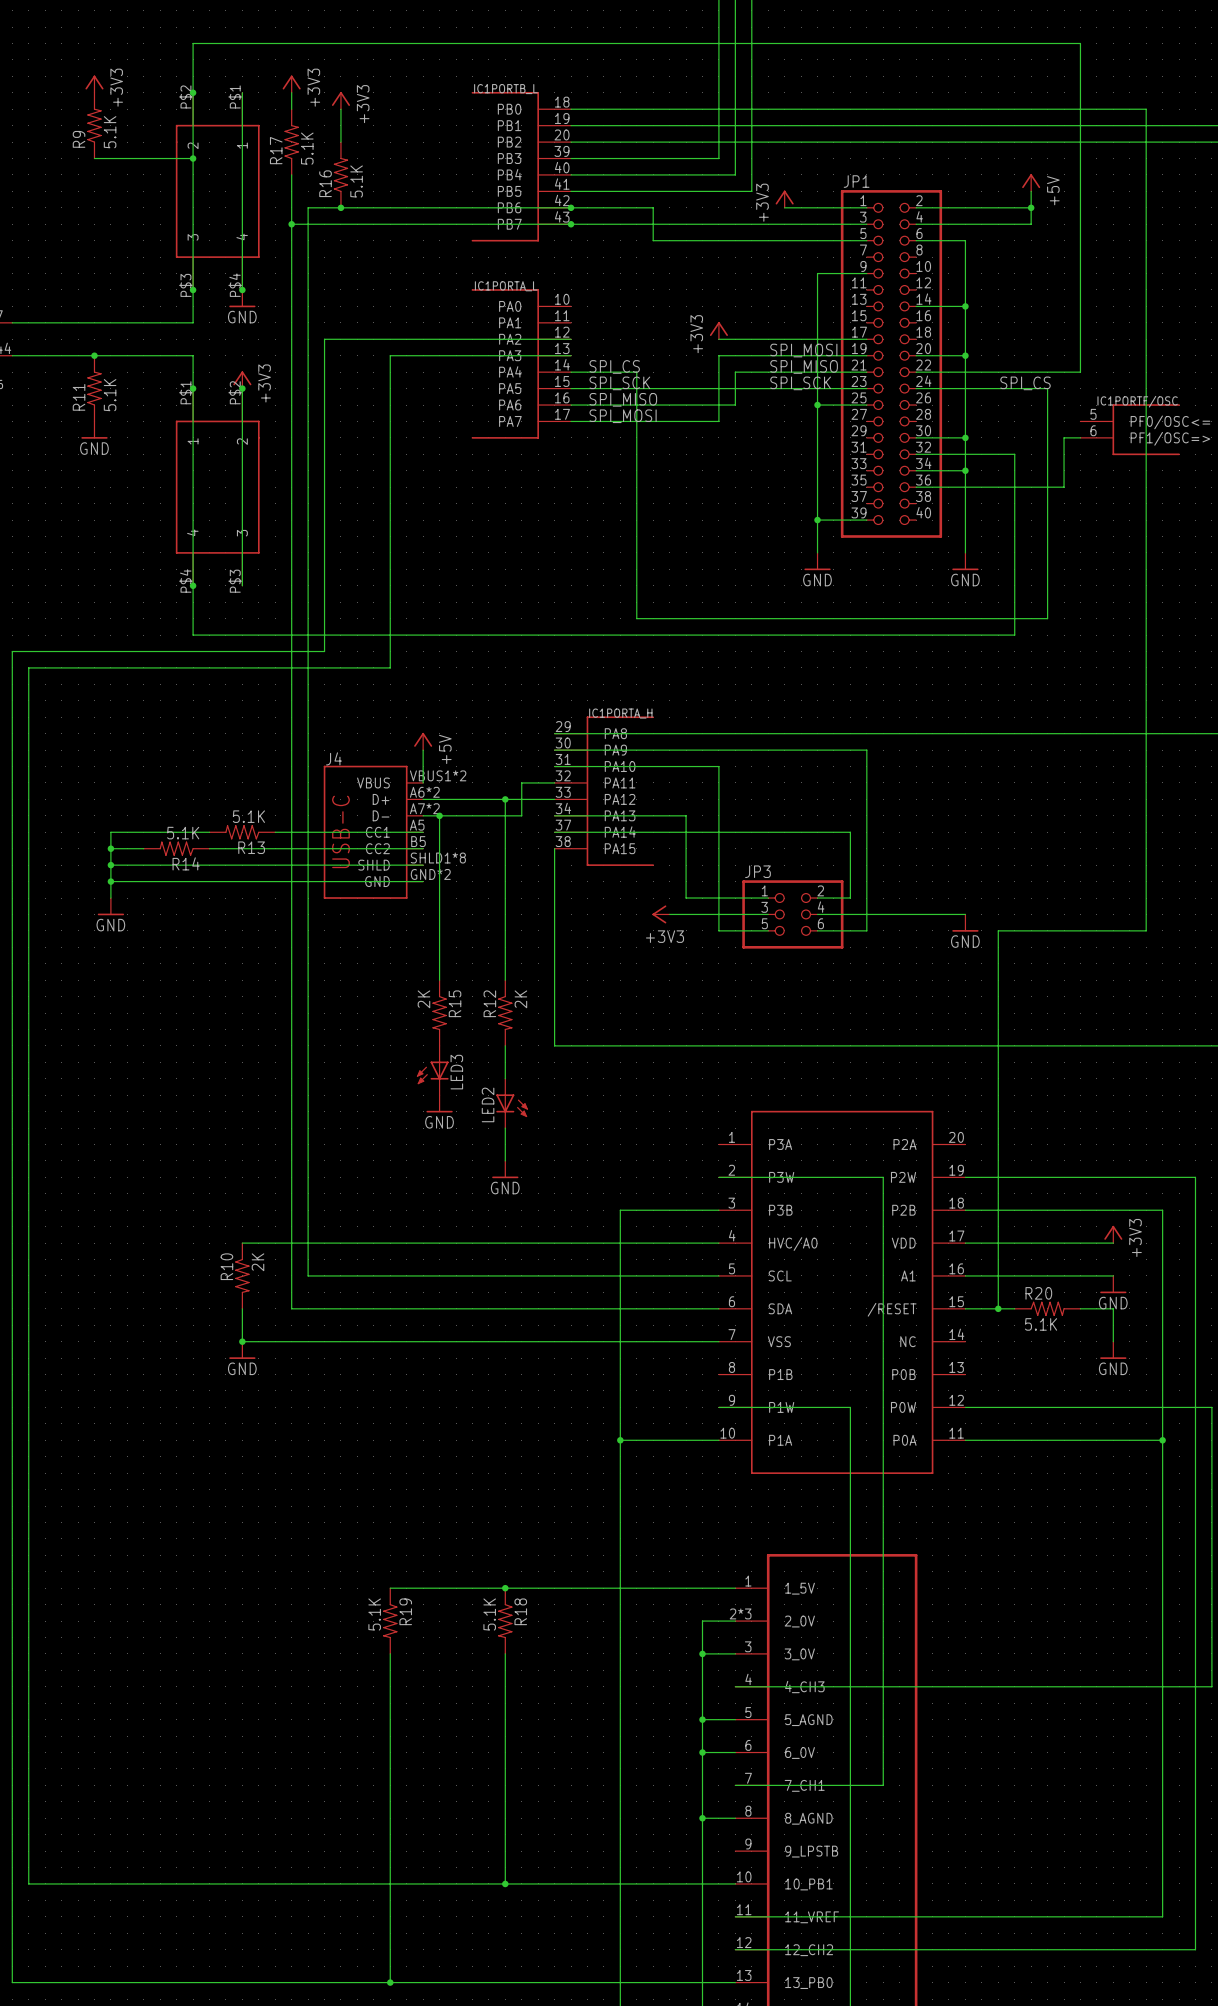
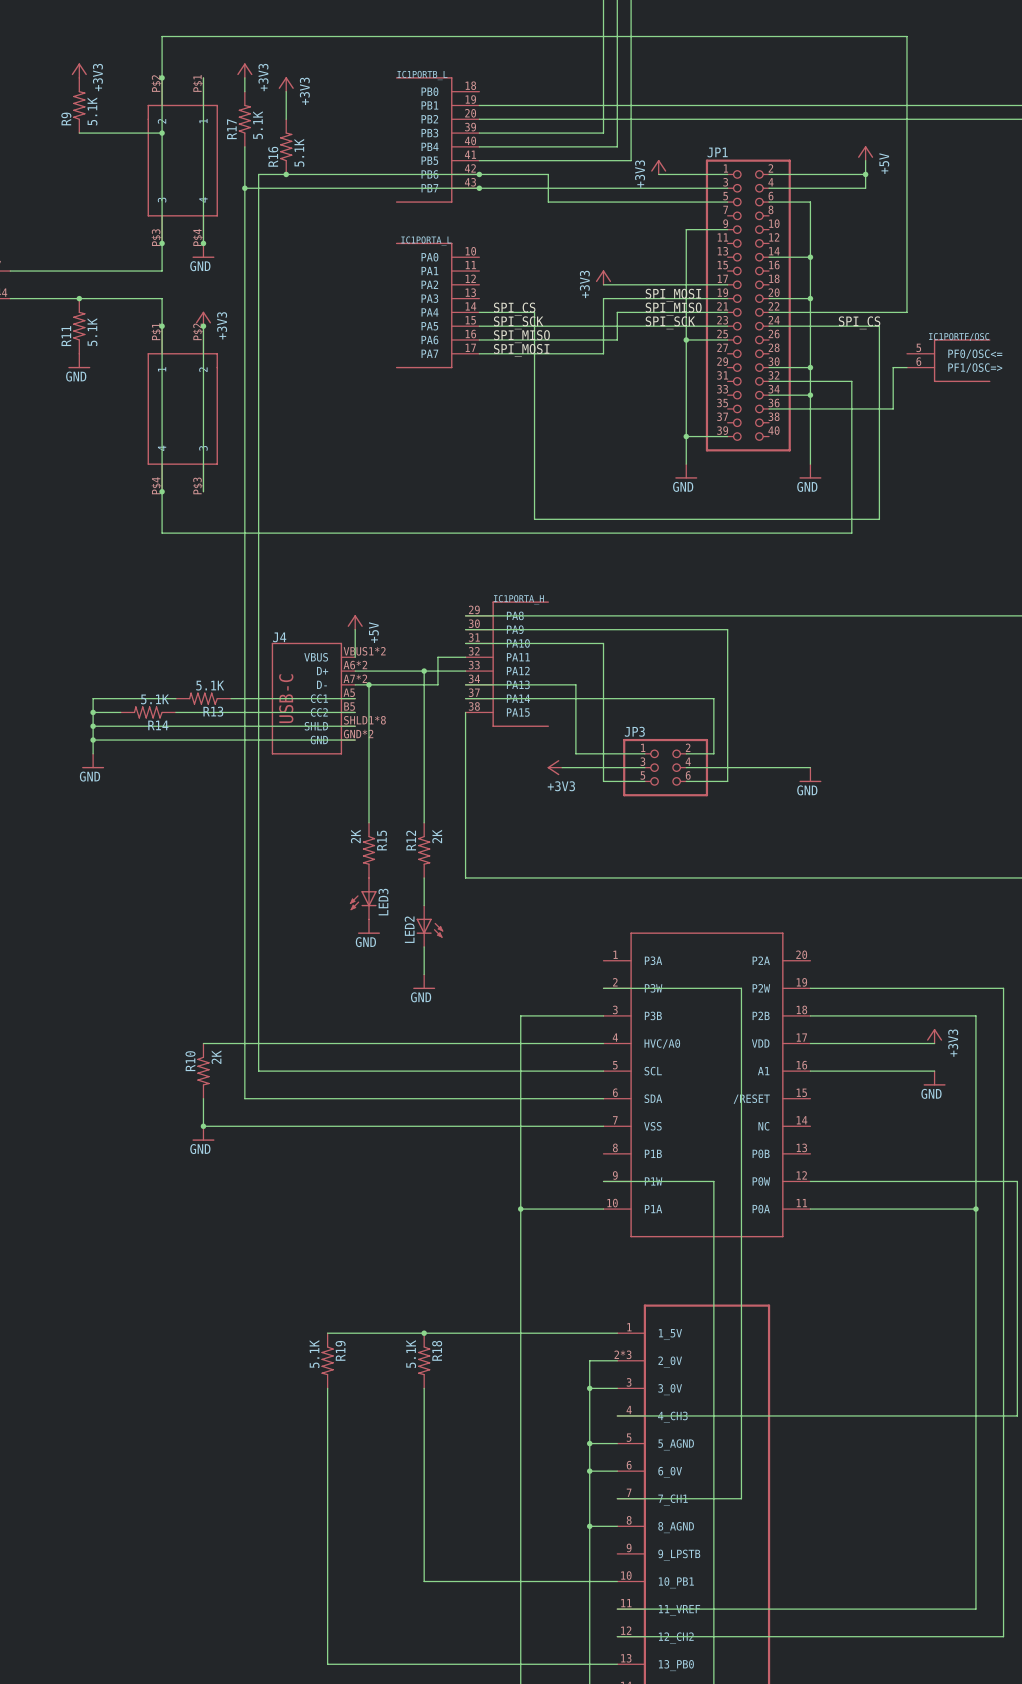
wire: (571, 109) (1146, 109) (1146, 930) (998, 930) (998, 1308) -> none
wire: (571, 339) (324, 339) (324, 651) (12, 651) (12, 1982) (390, 1982) -> none
wire: (571, 355) (390, 355) (390, 667) (28, 667) (28, 1883) (505, 1883) -> none
wire: (965, 1308) (1014, 1308) -> none
junction: (998, 1308) -> none
R20: 5.1K (1047, 1308) -> none
wire: (1080, 1308) (1113, 1308) (1113, 1341) -> none
power symbol: GND (1113, 1350) -> none
junction: (505, 1883) -> none
junction: (390, 1982) -> none

